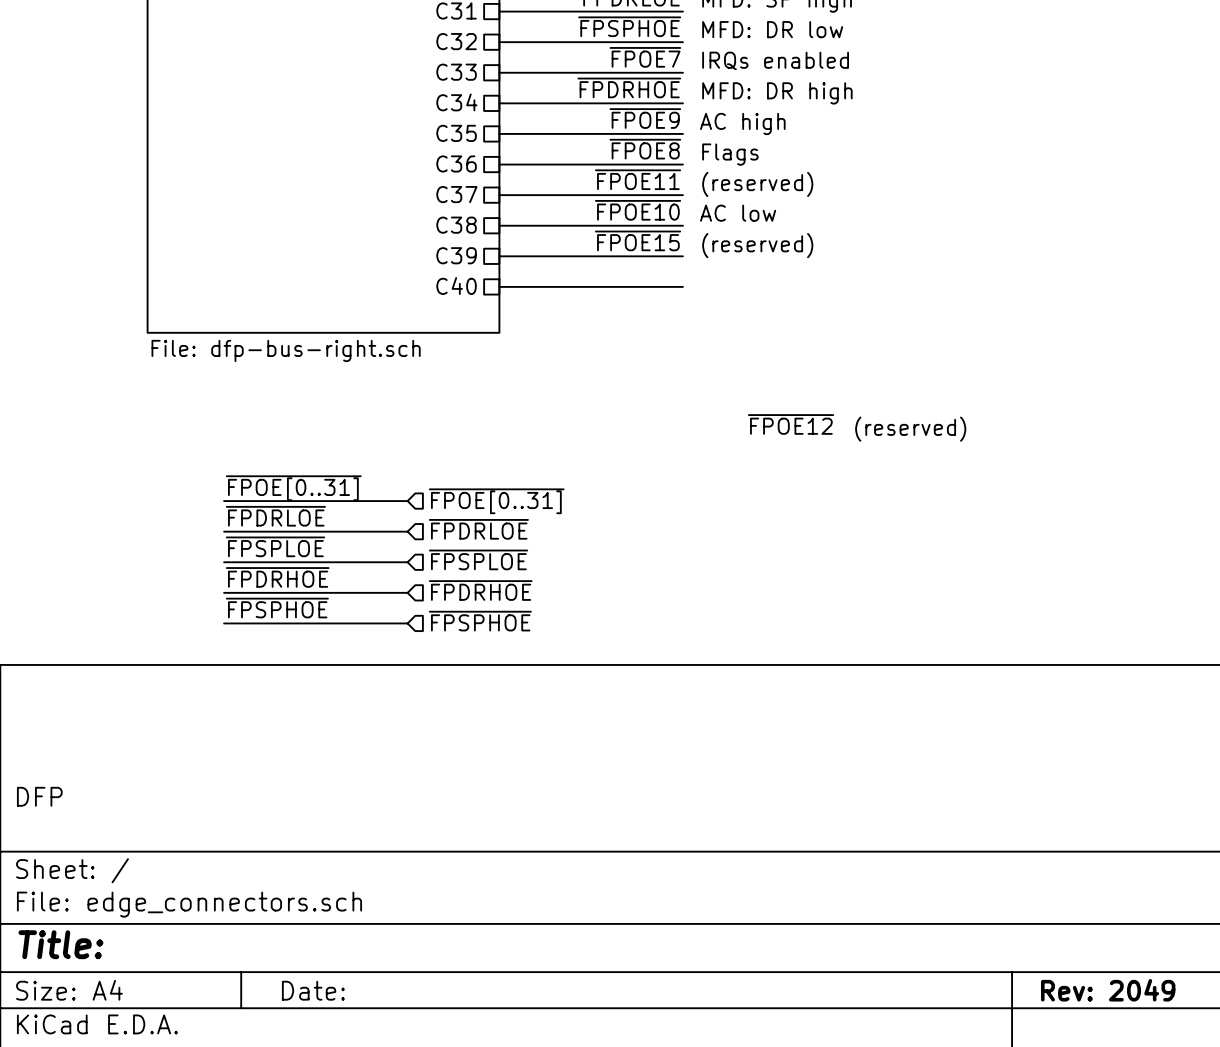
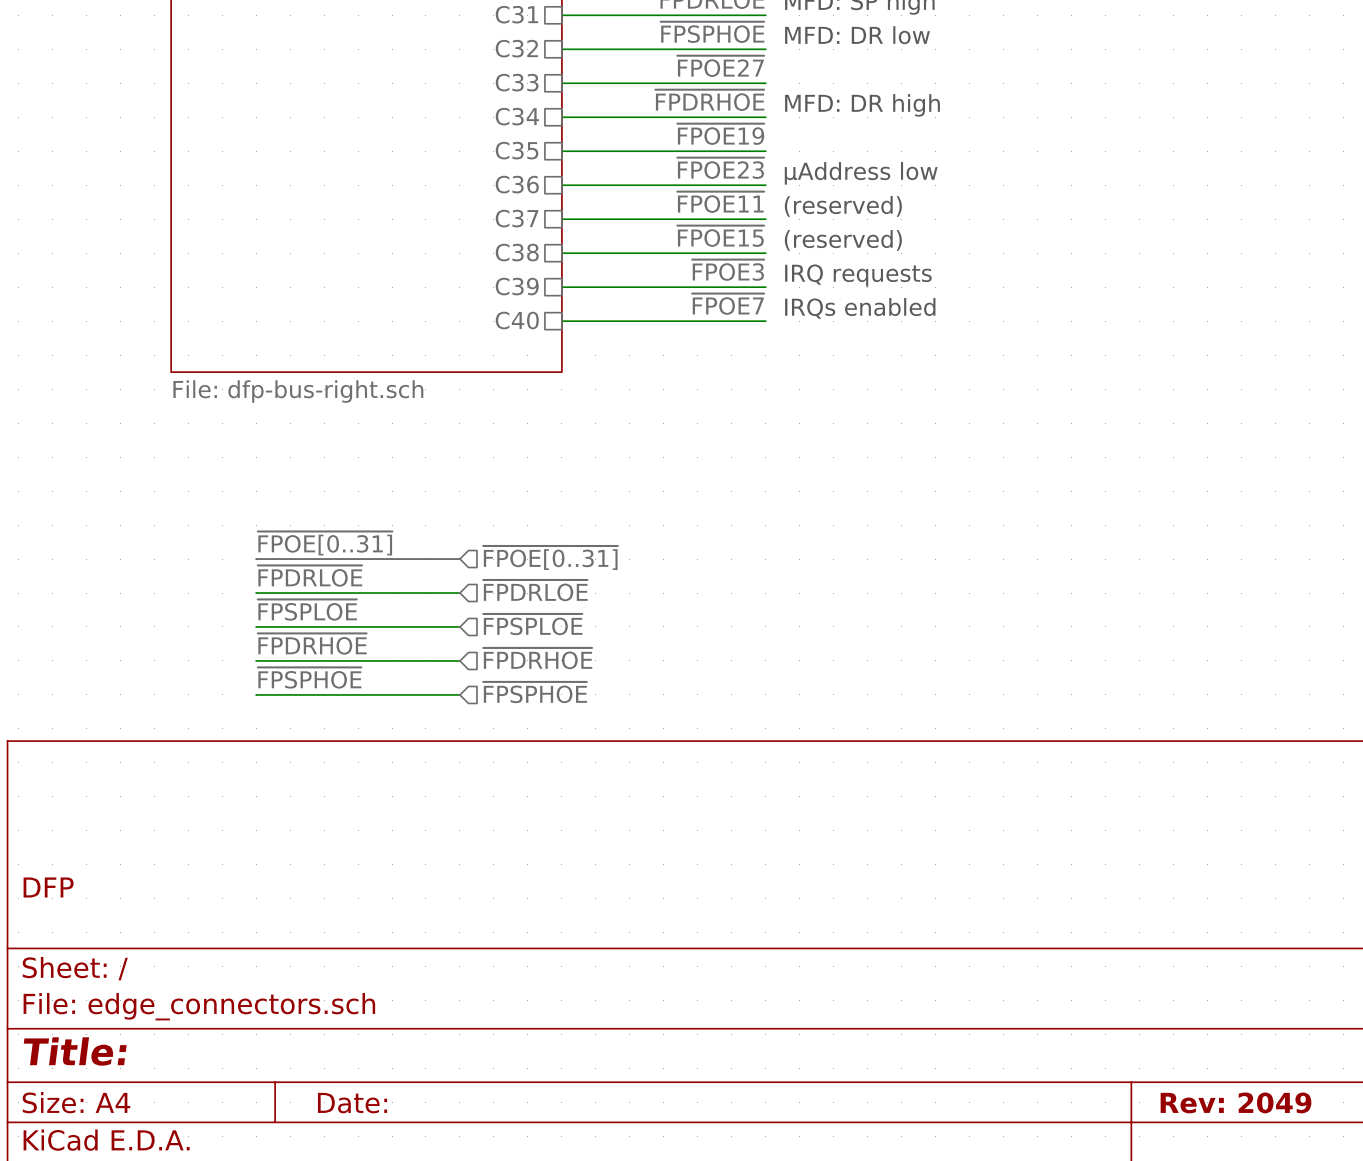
label: ~{FPOE7} (645, 57) -> ~{FPOE27} (720, 66)
text position: IRQs enabled (775, 60) -> IRQs enabled (860, 308)
label: ~{FPOE9} (645, 118) -> ~{FPOE19} (720, 134)
text: AC high (742, 123) -> none
label: ~{FPOE8} (645, 149) -> ~{FPOE23} (720, 168)
text: Flags (730, 154) -> µAddress low (861, 173)
label: ~{FPOE10} (638, 210) -> ~{FPOE15} (720, 236)
text: AC low (738, 213) -> (reserved) (843, 240)
label: ~{FPOE15} (638, 240) -> ~{FPOE3} (728, 270)
text: (reserved) (757, 245) -> IRQ requests (858, 275)
label: none -> ~{FPOE7} (728, 304)
label: ~{FPOE12} (791, 424) -> none
text: (reserved) (910, 429) -> none

